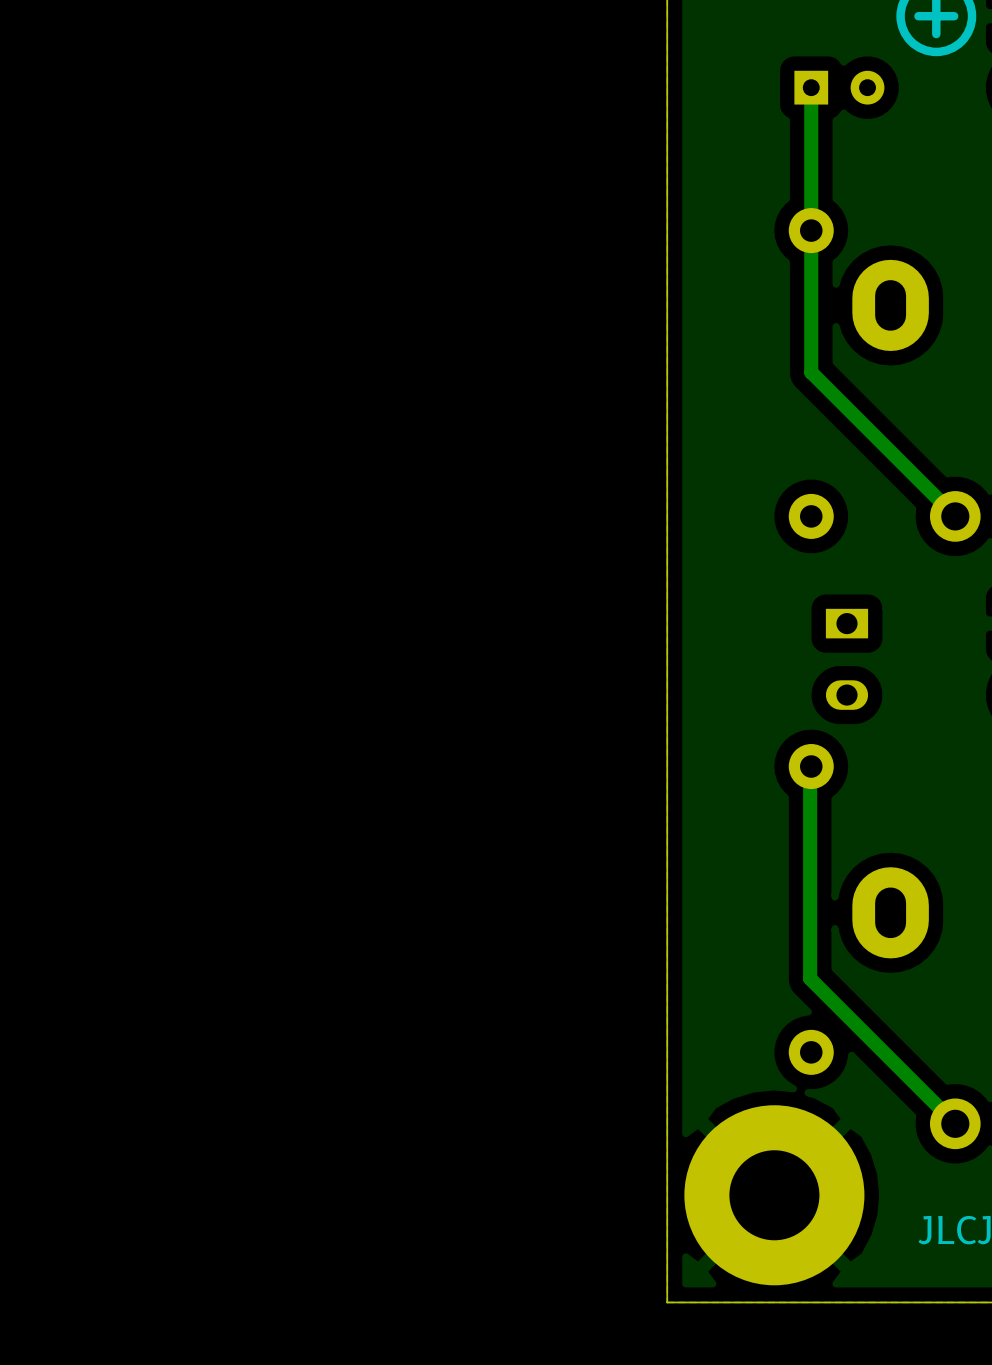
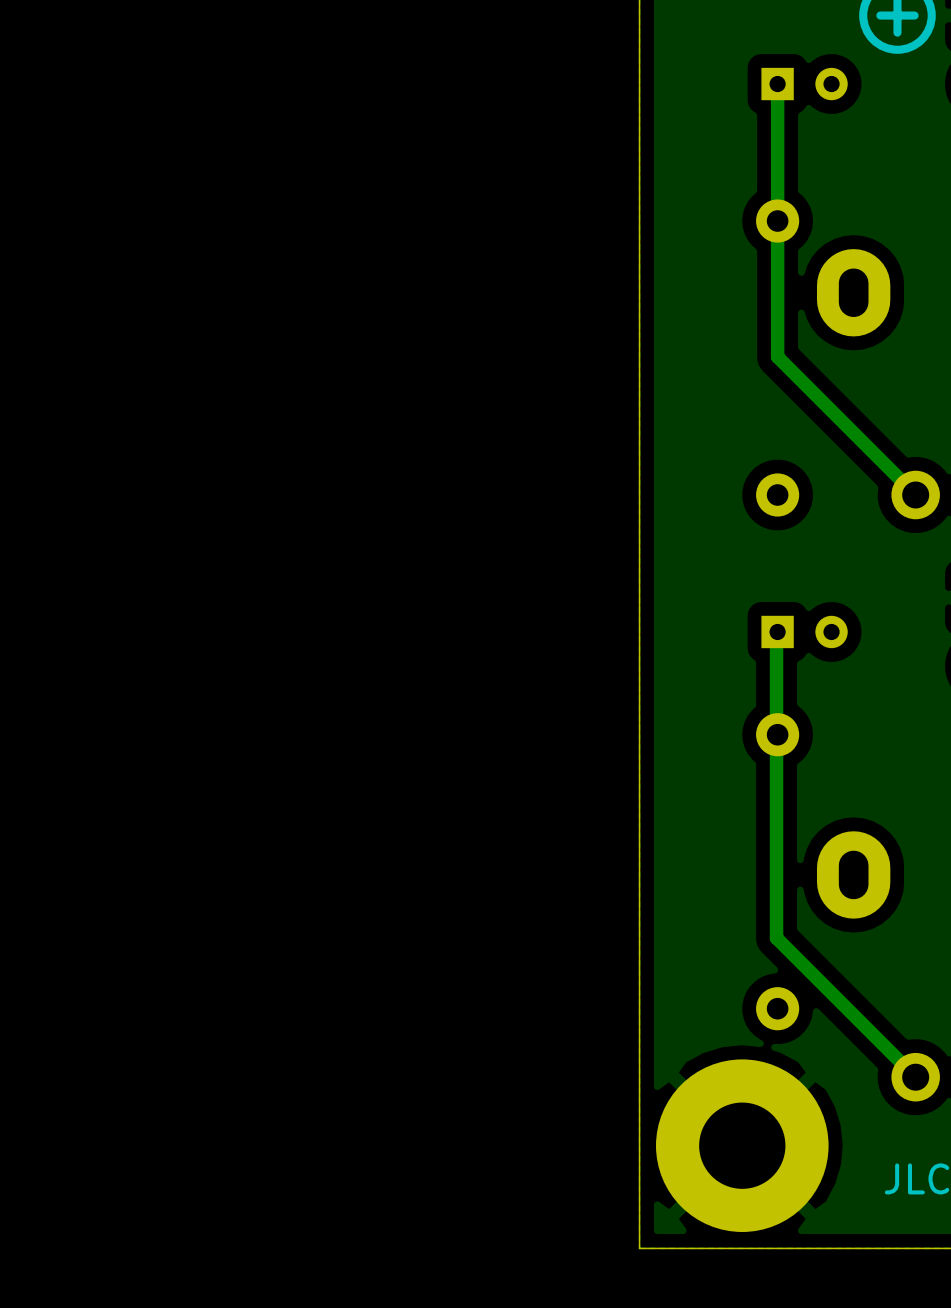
part footprint: [825, 608, 869, 710] -> [761, 615, 848, 649]
track: none -> (776, 634) (776, 734)

